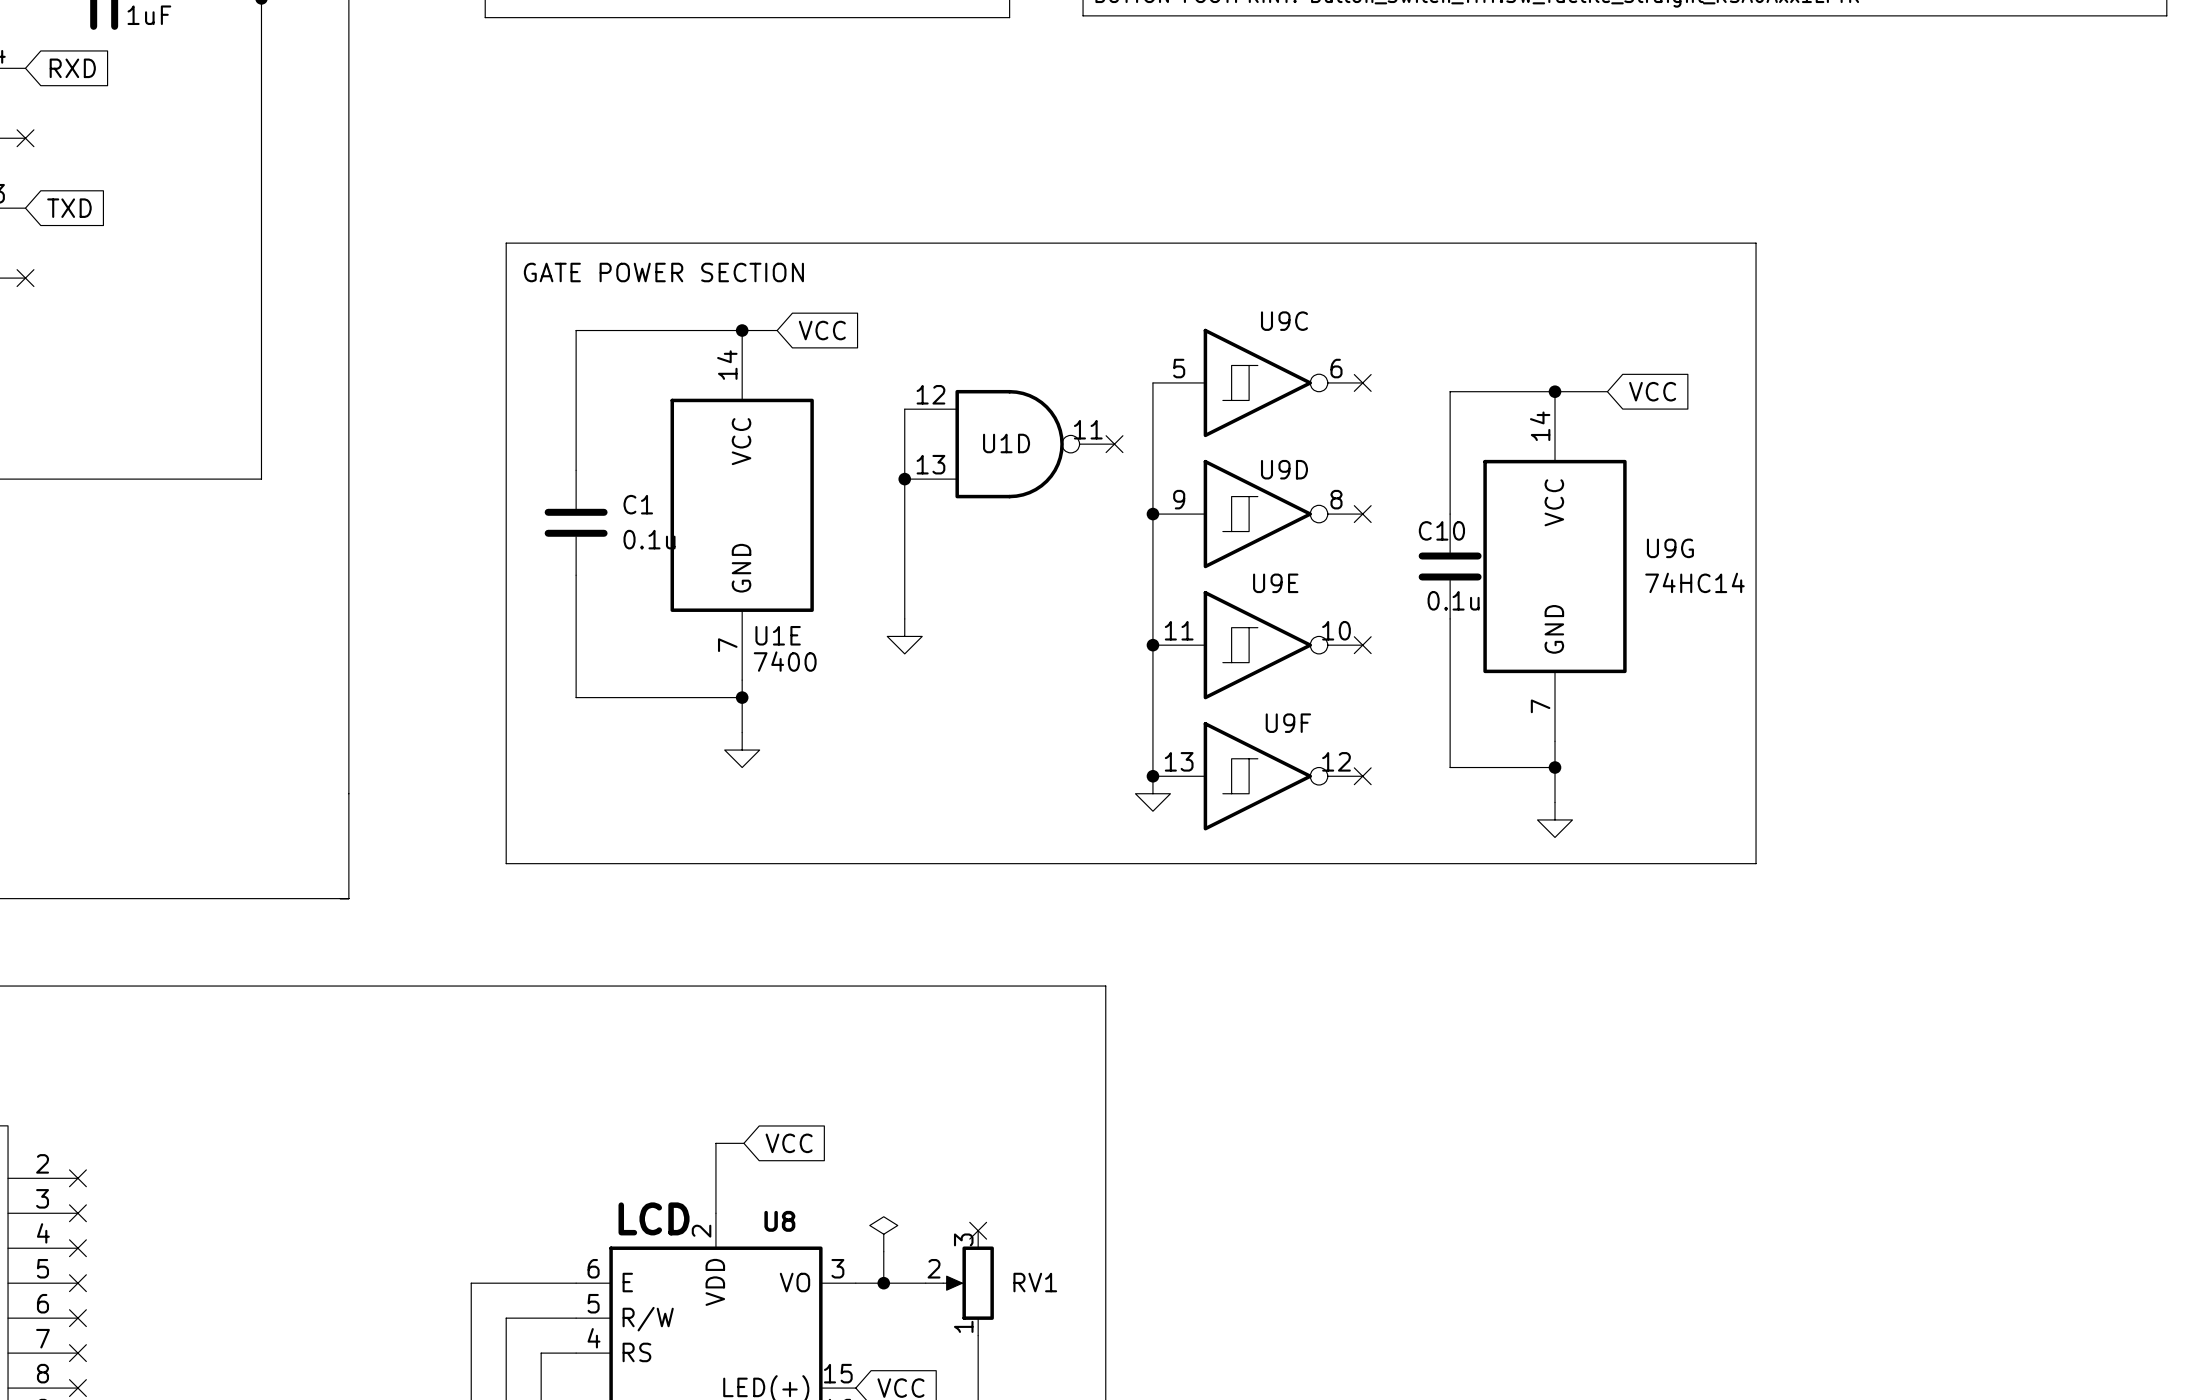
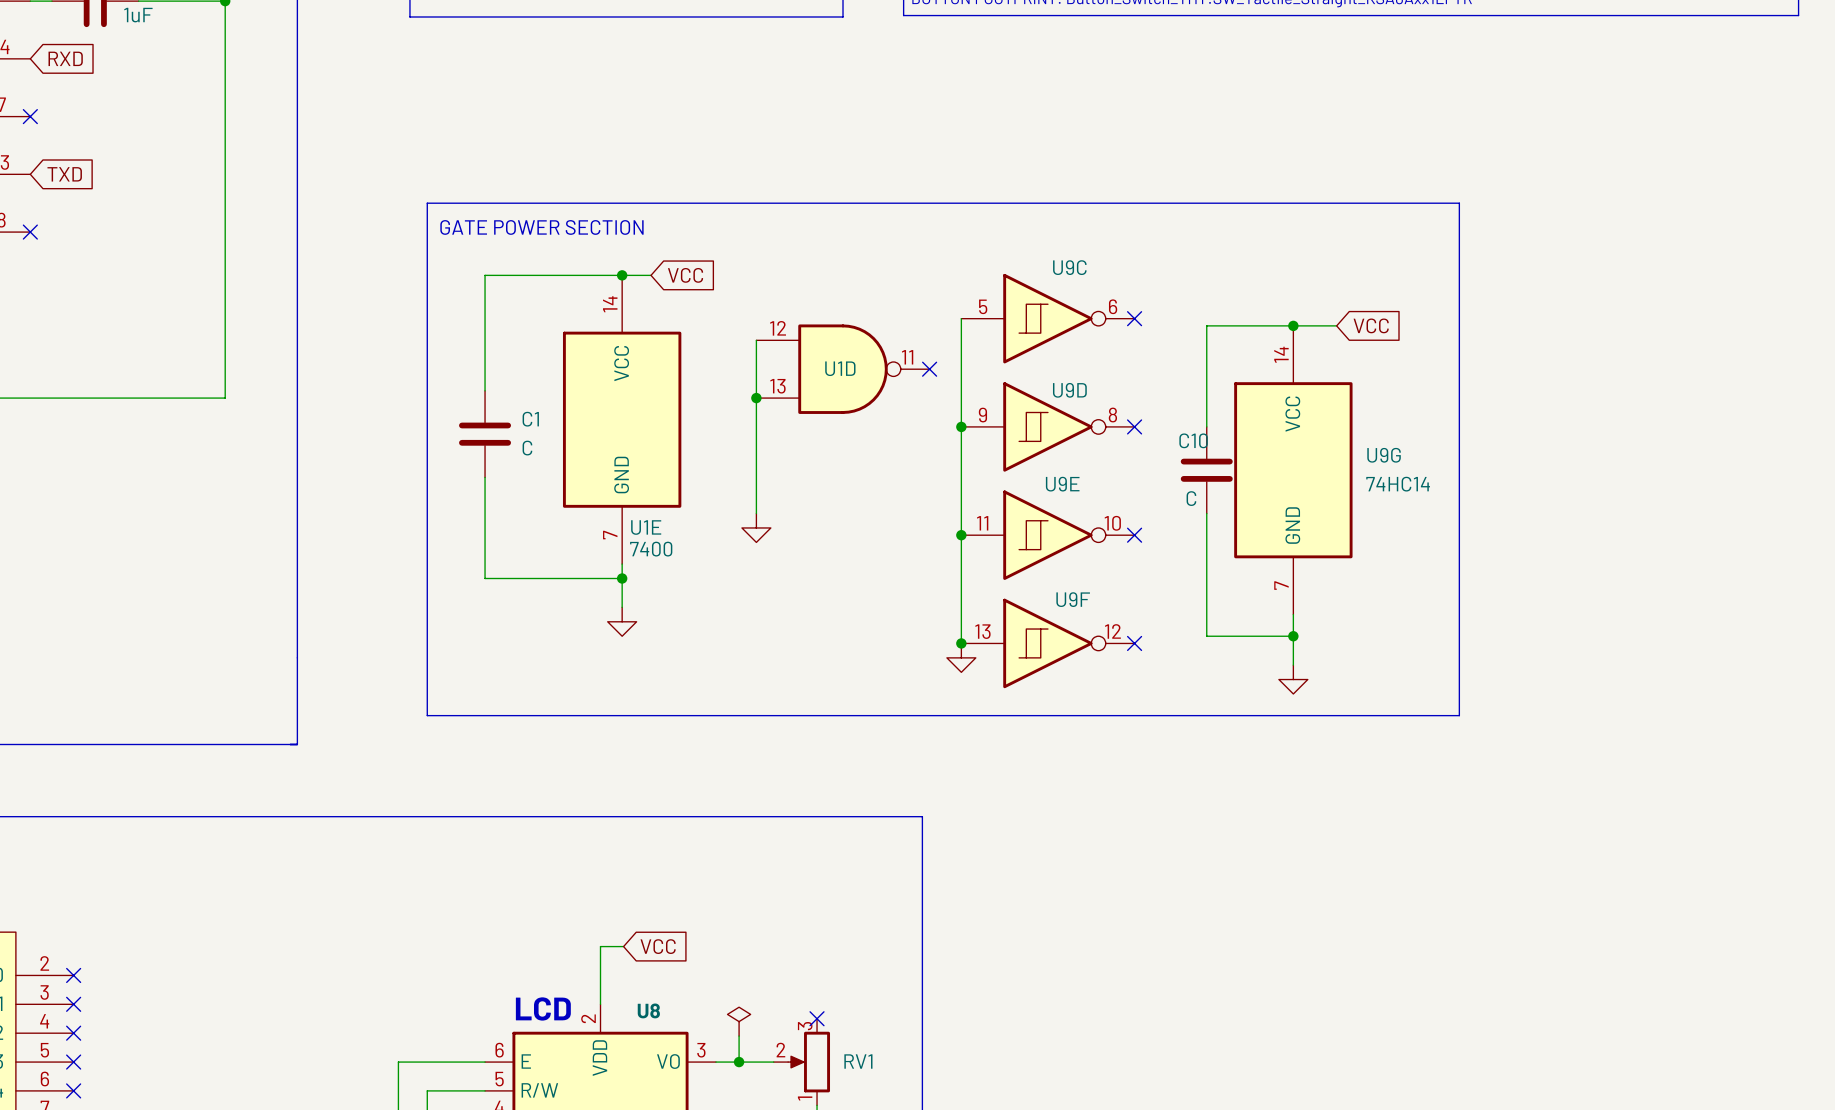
C1 value: 0.1u (649, 539) -> C (527, 448)
C10 value: 0.1u (1453, 600) -> C (1191, 498)

